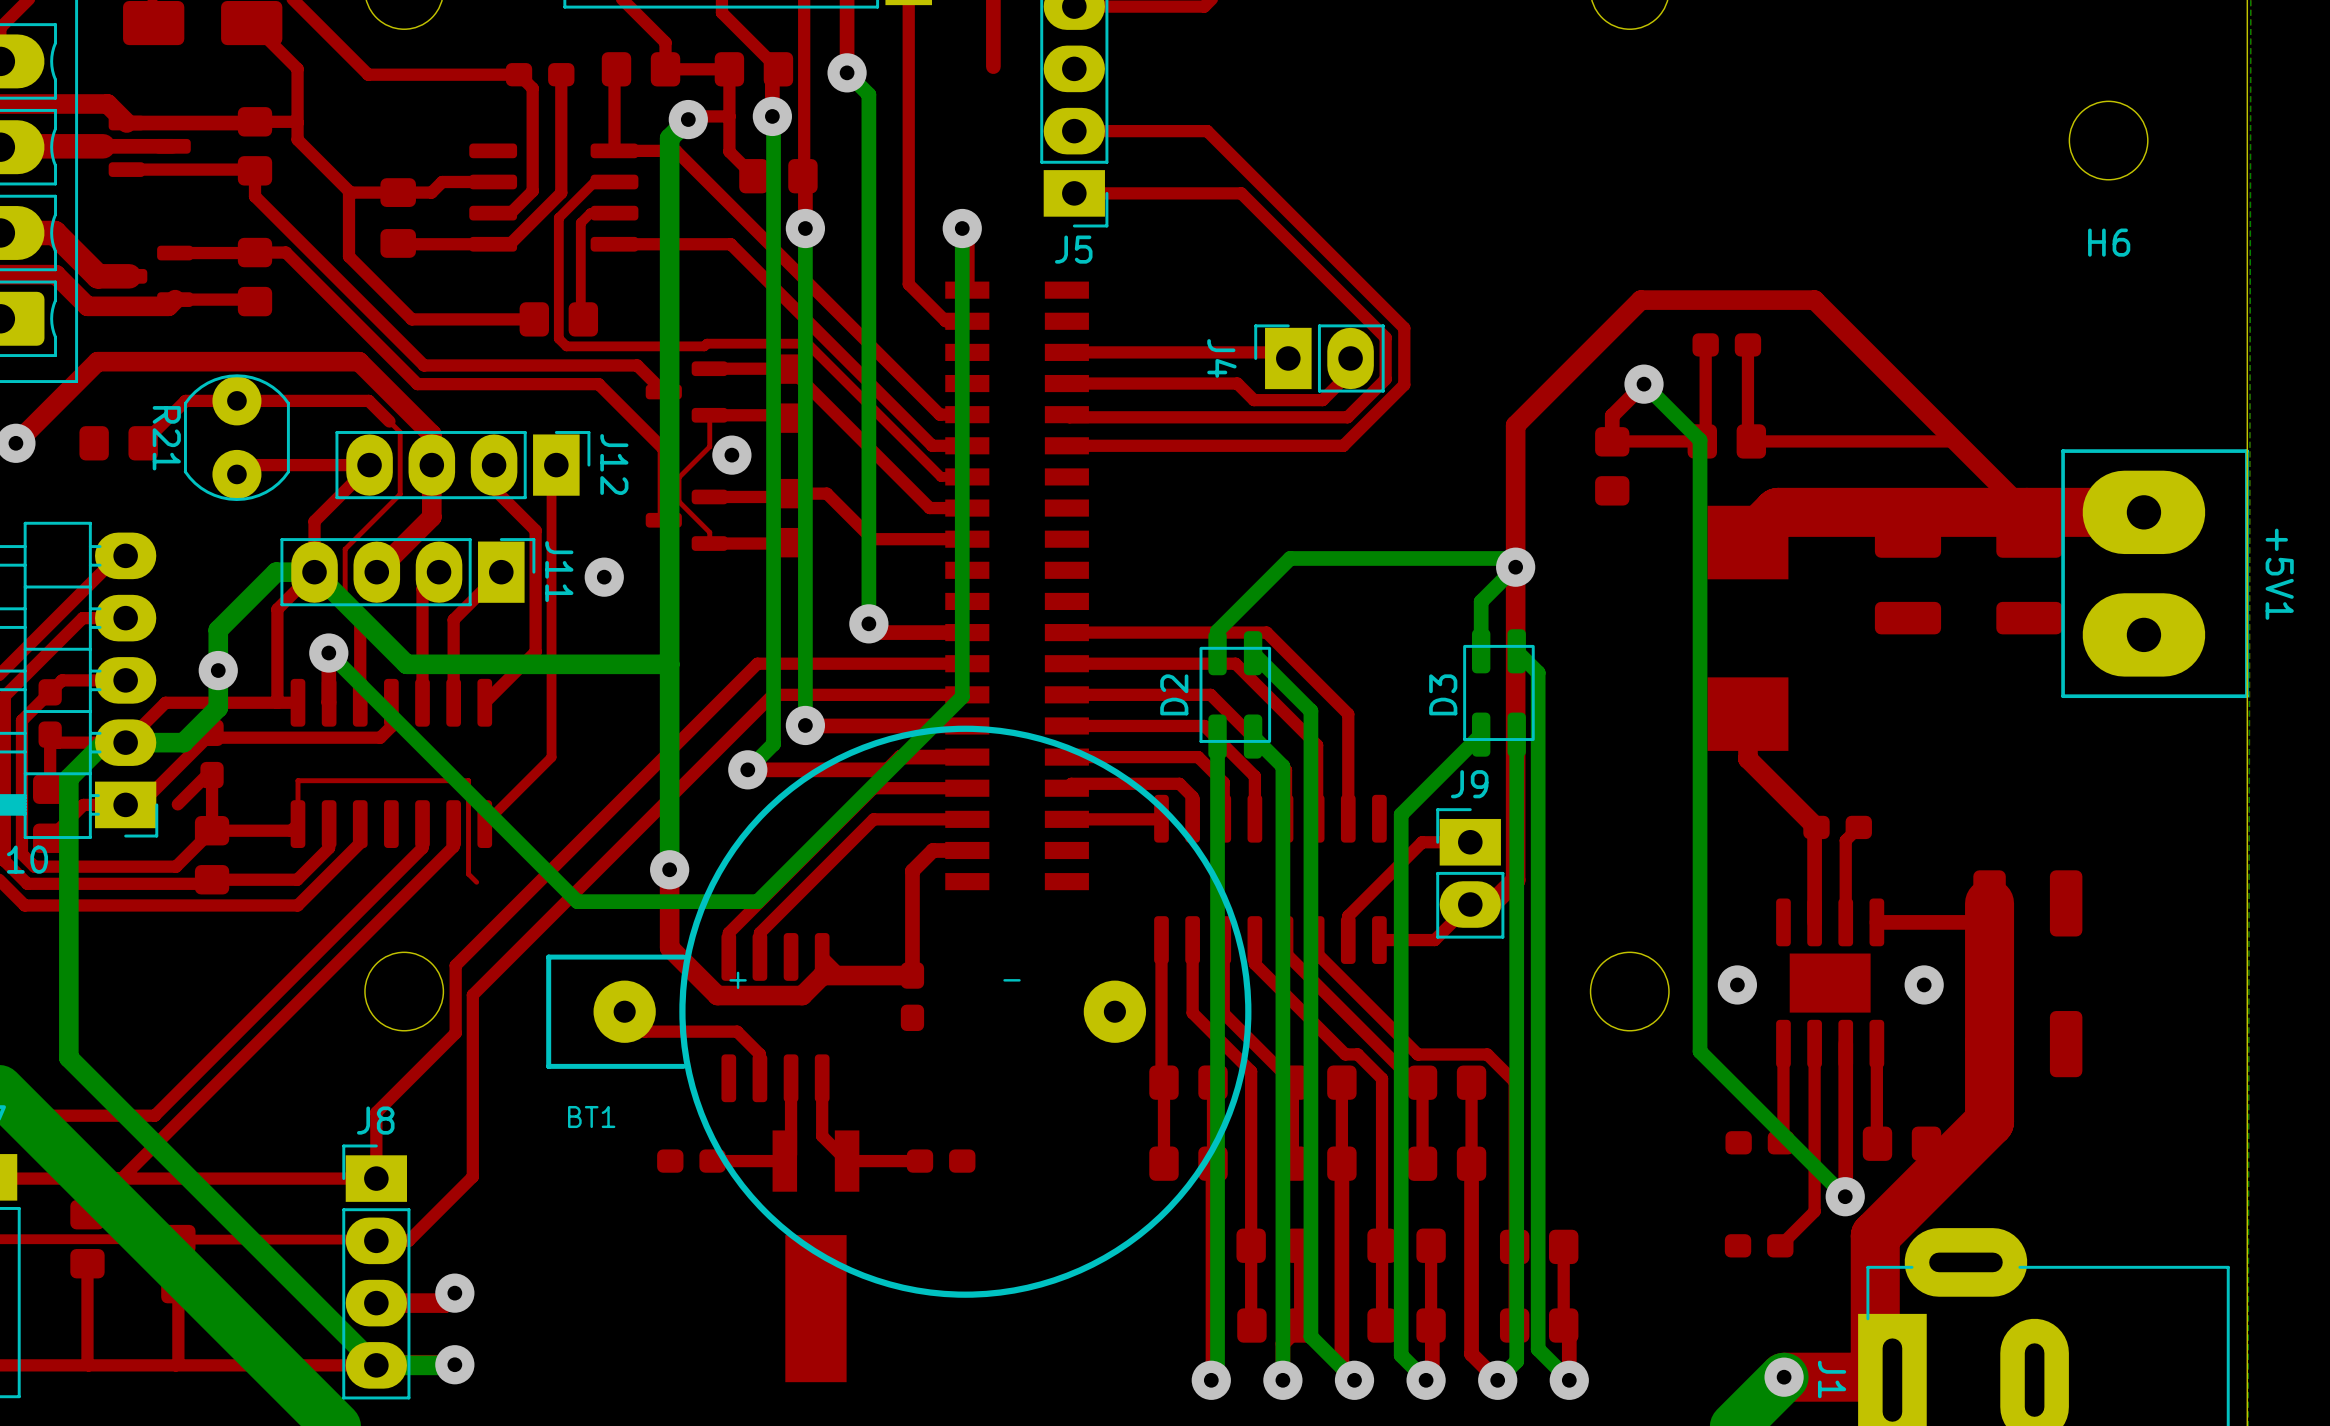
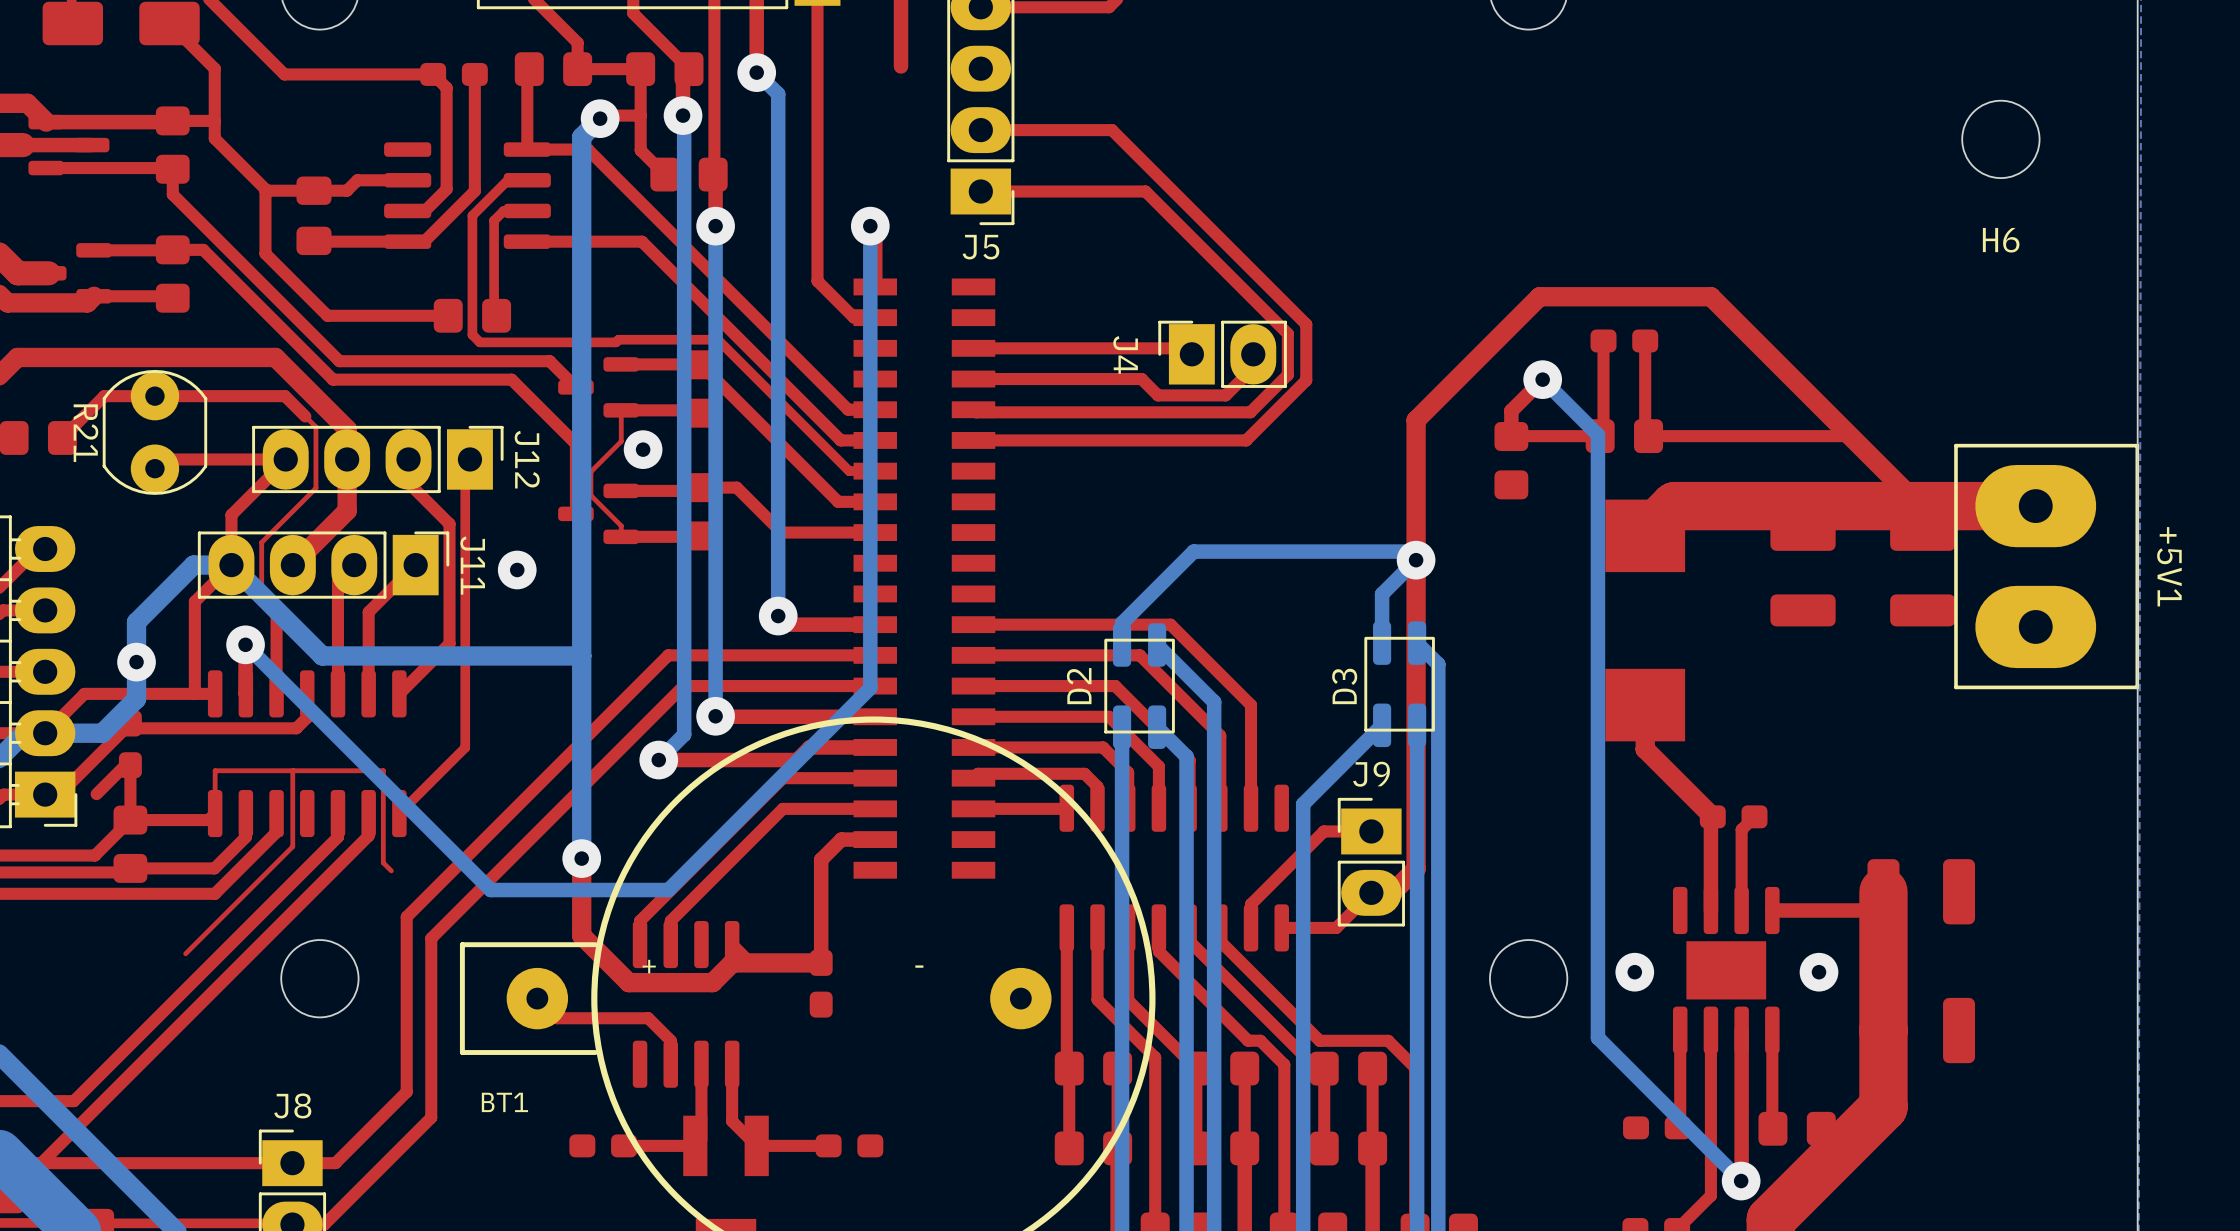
top track: none -> (293, 770) (292, 846) (185, 953)
top track: (492, 928) (455, 965) (455, 1033) (376, 1112) (376, 1178) -> (406, 916) (406, 1091) (335, 1163) (292, 1163)
top track: (517, 950) (472, 995) (472, 1176) -> (431, 938) (431, 1117) (387, 1161)

